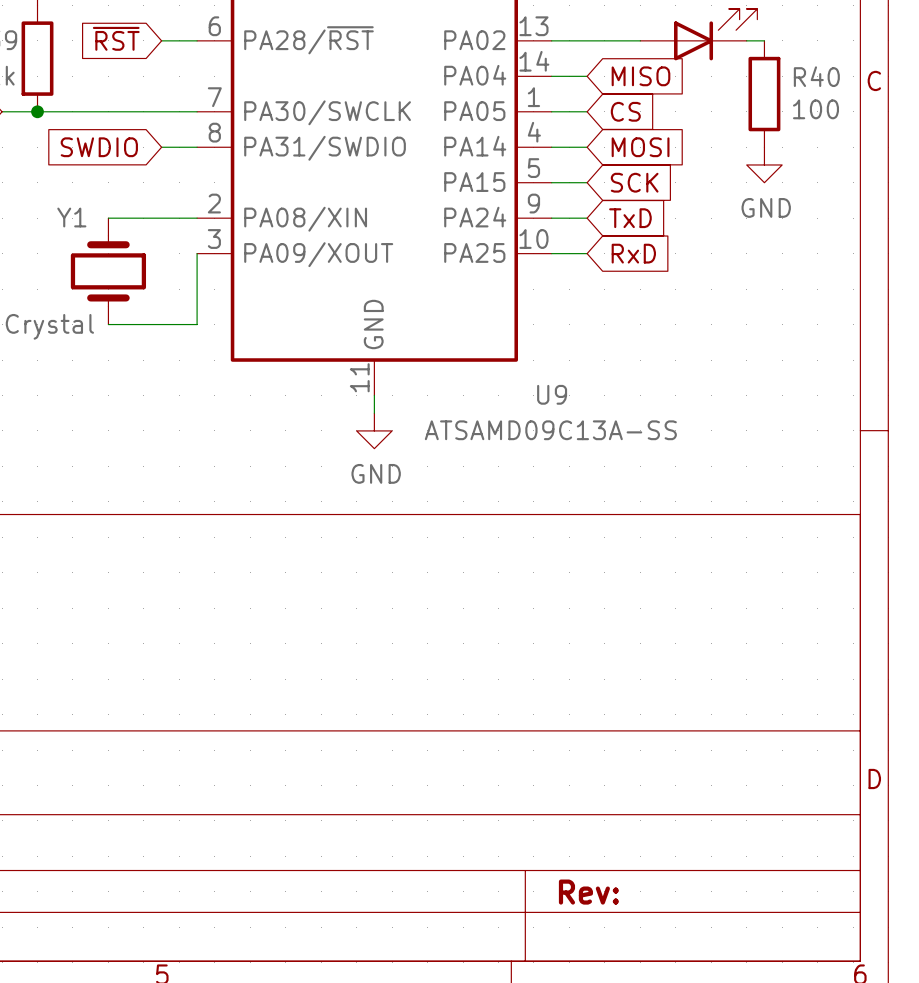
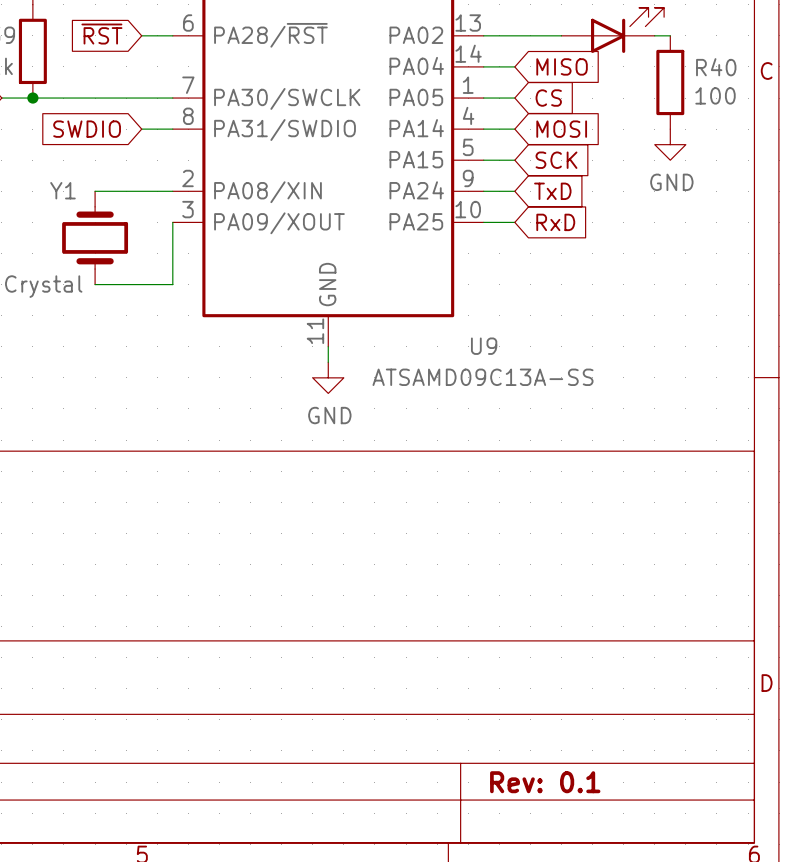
title block: Rev: (588, 892) -> Rev: 0.1 (545, 782)

